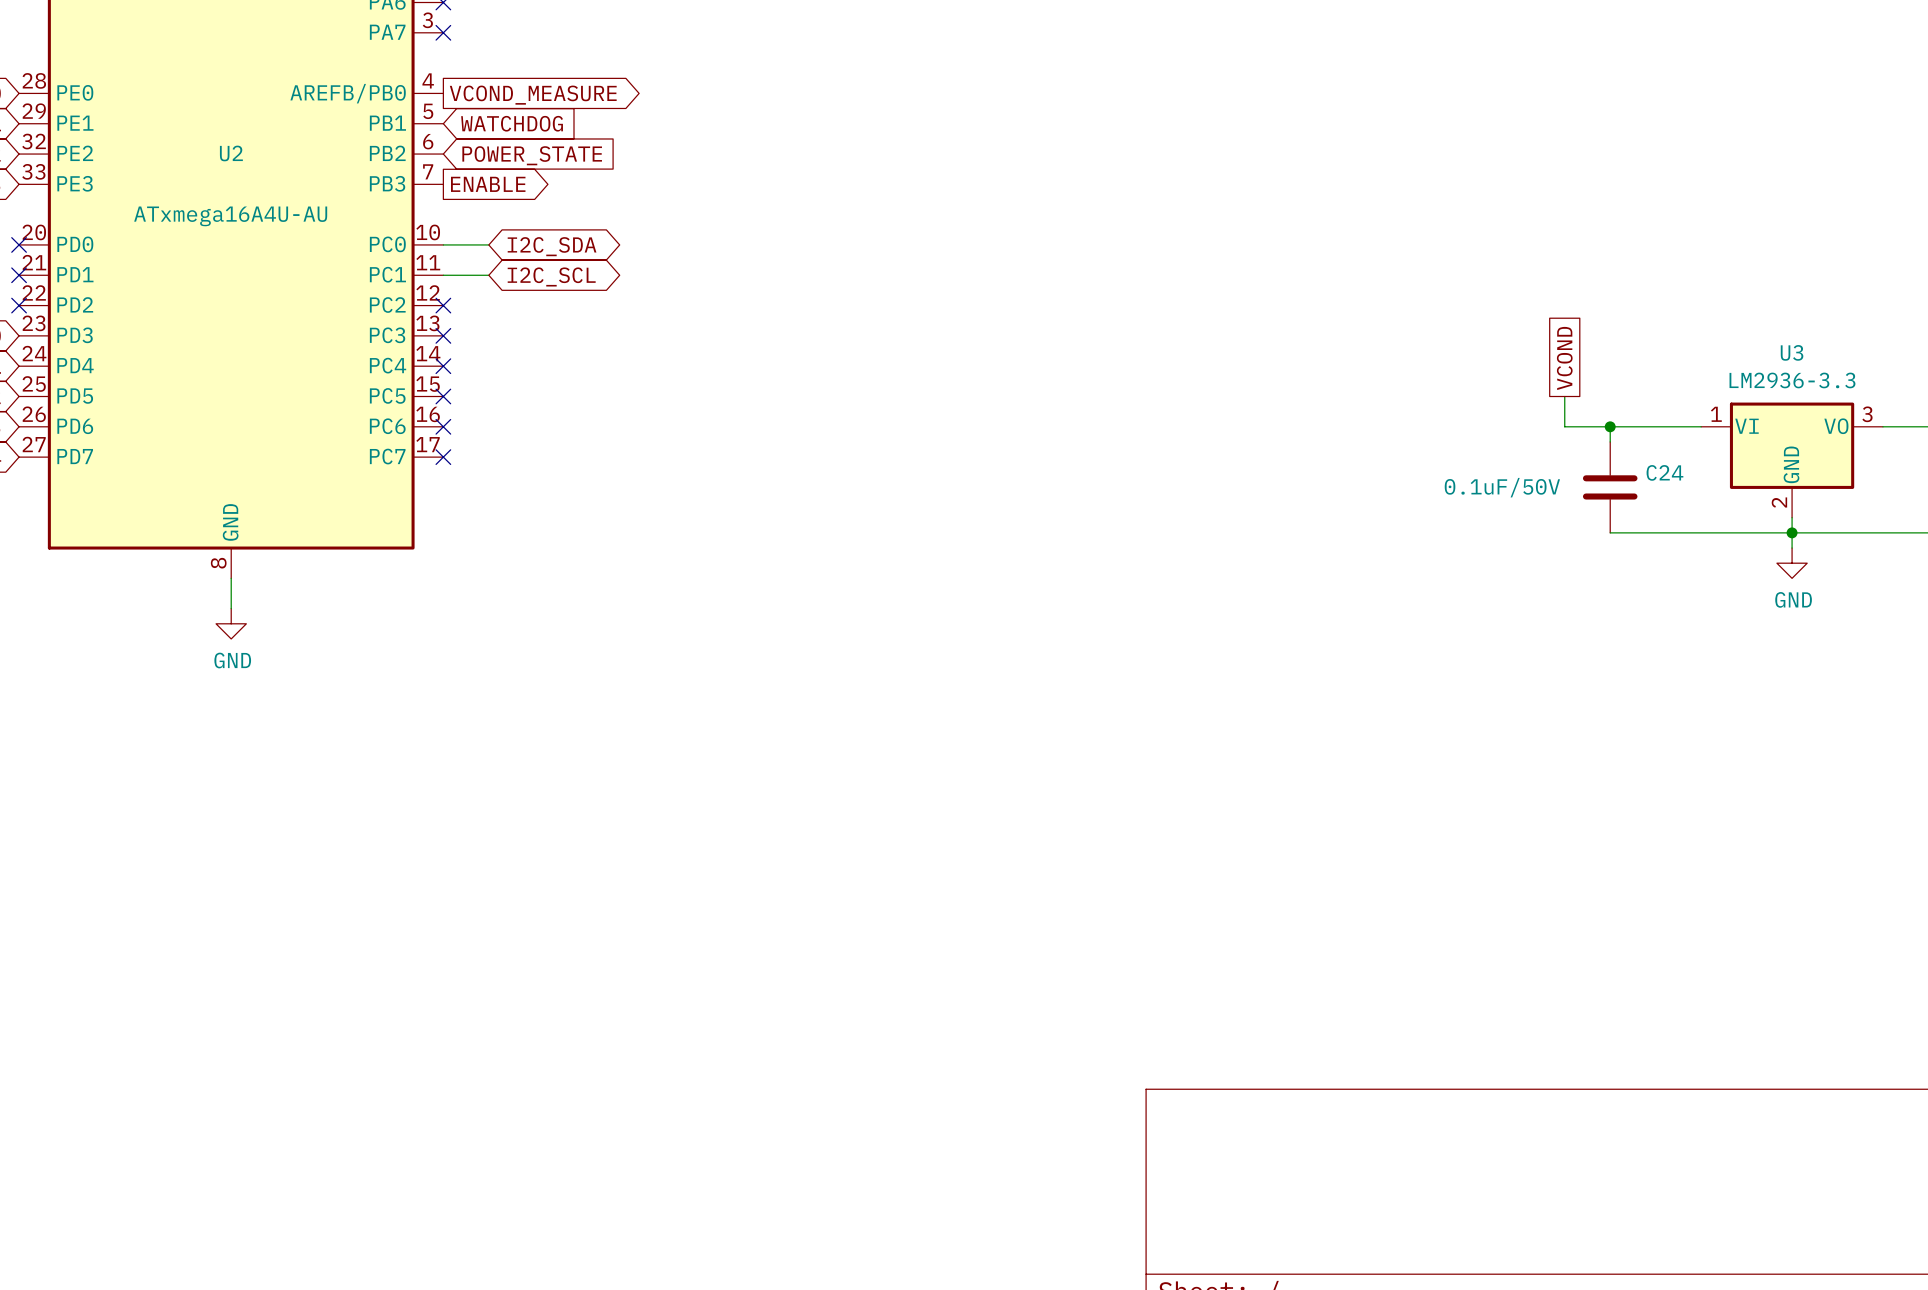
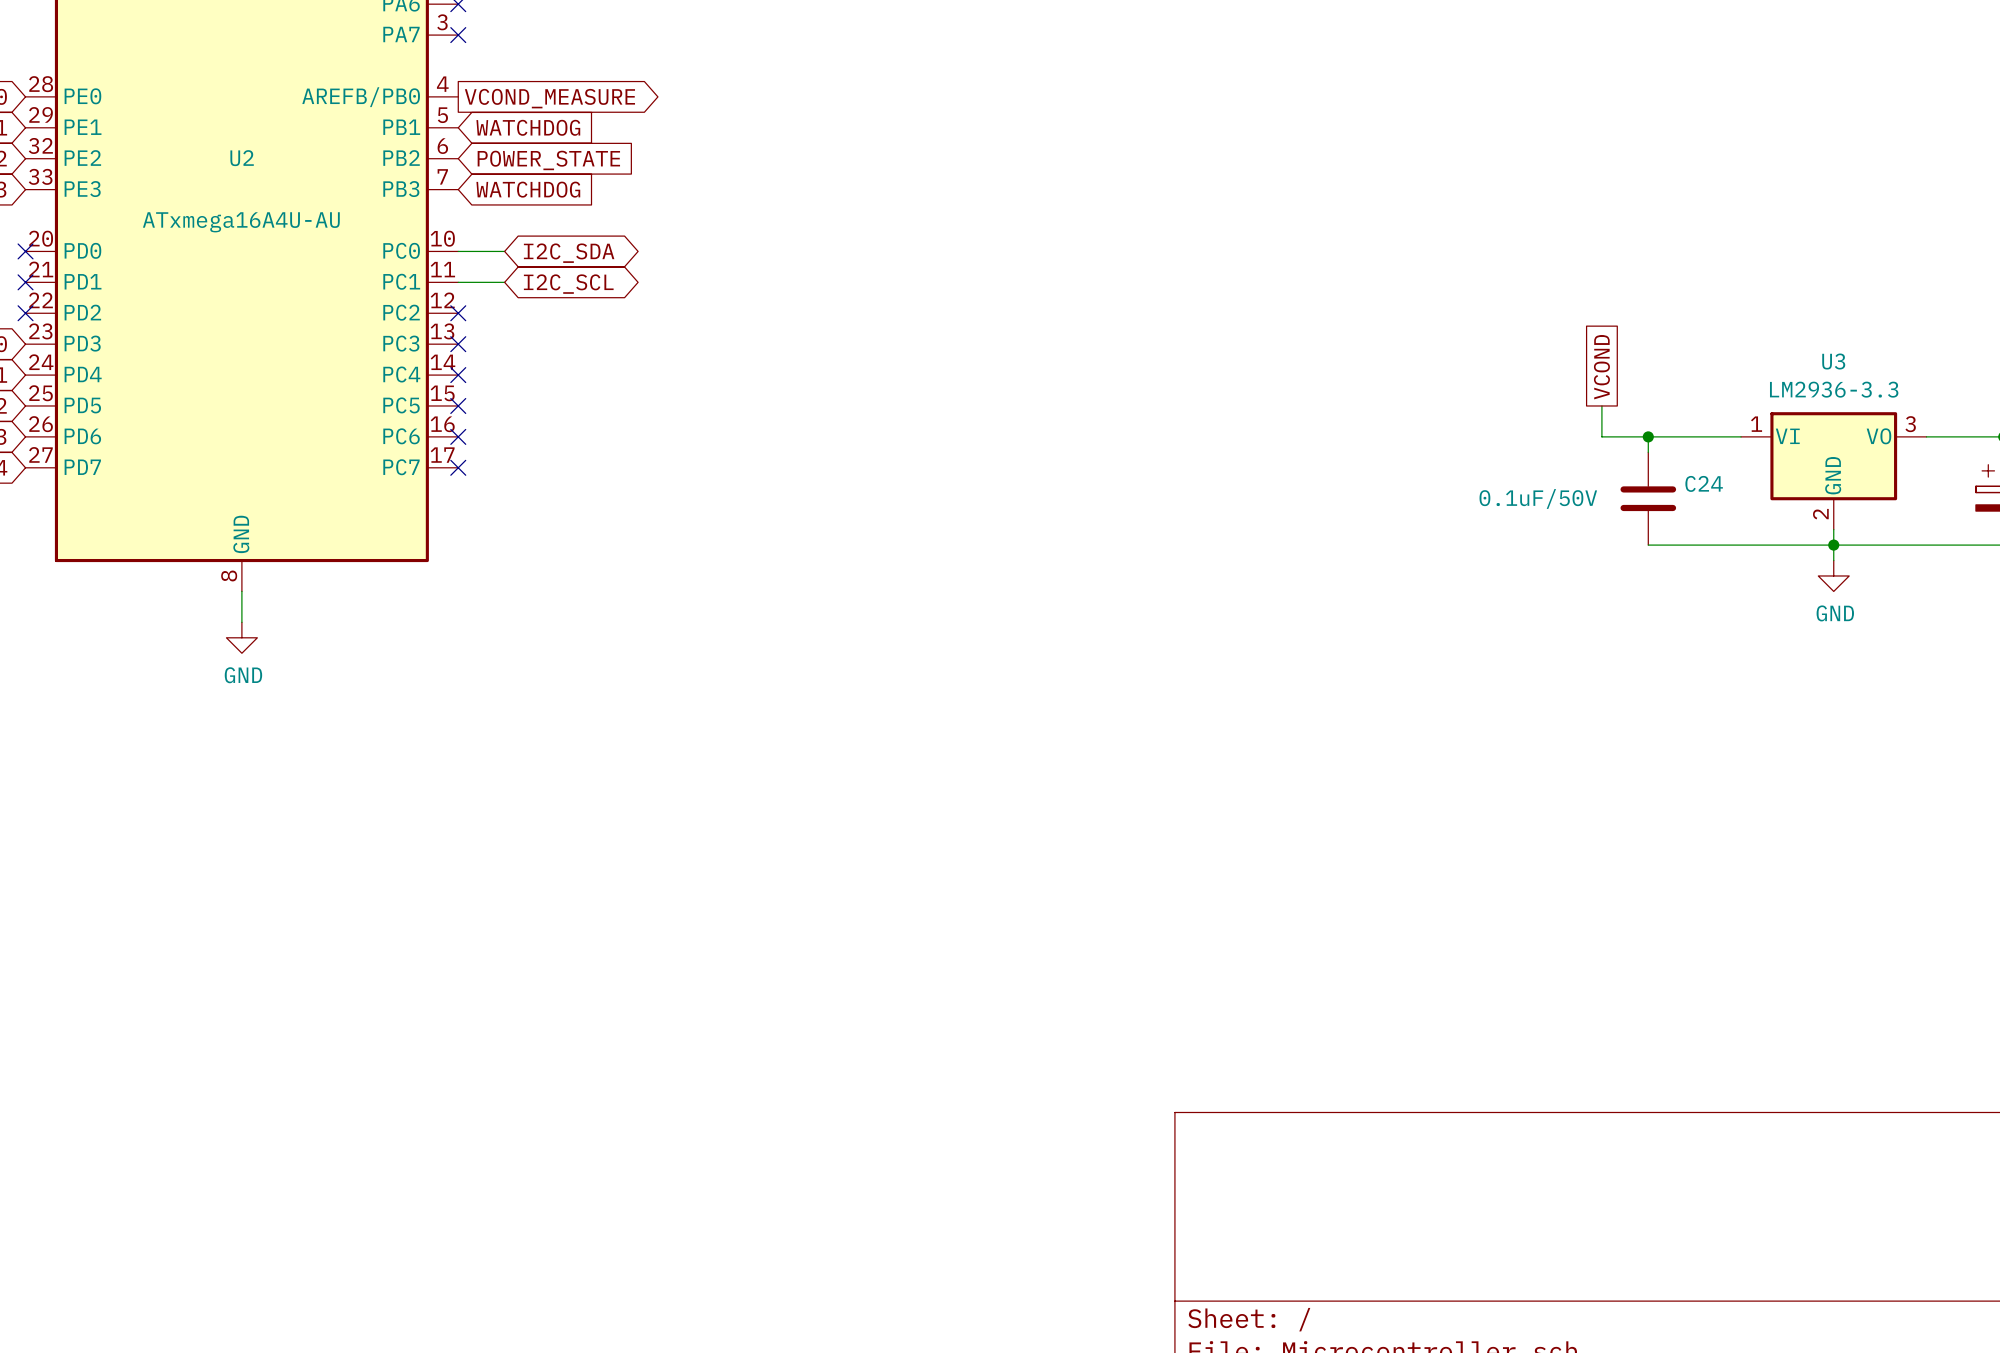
global label shape: output (488, 184) -> input (528, 189)
global label: ENABLE (488, 184) -> WATCHDOG (528, 189)

